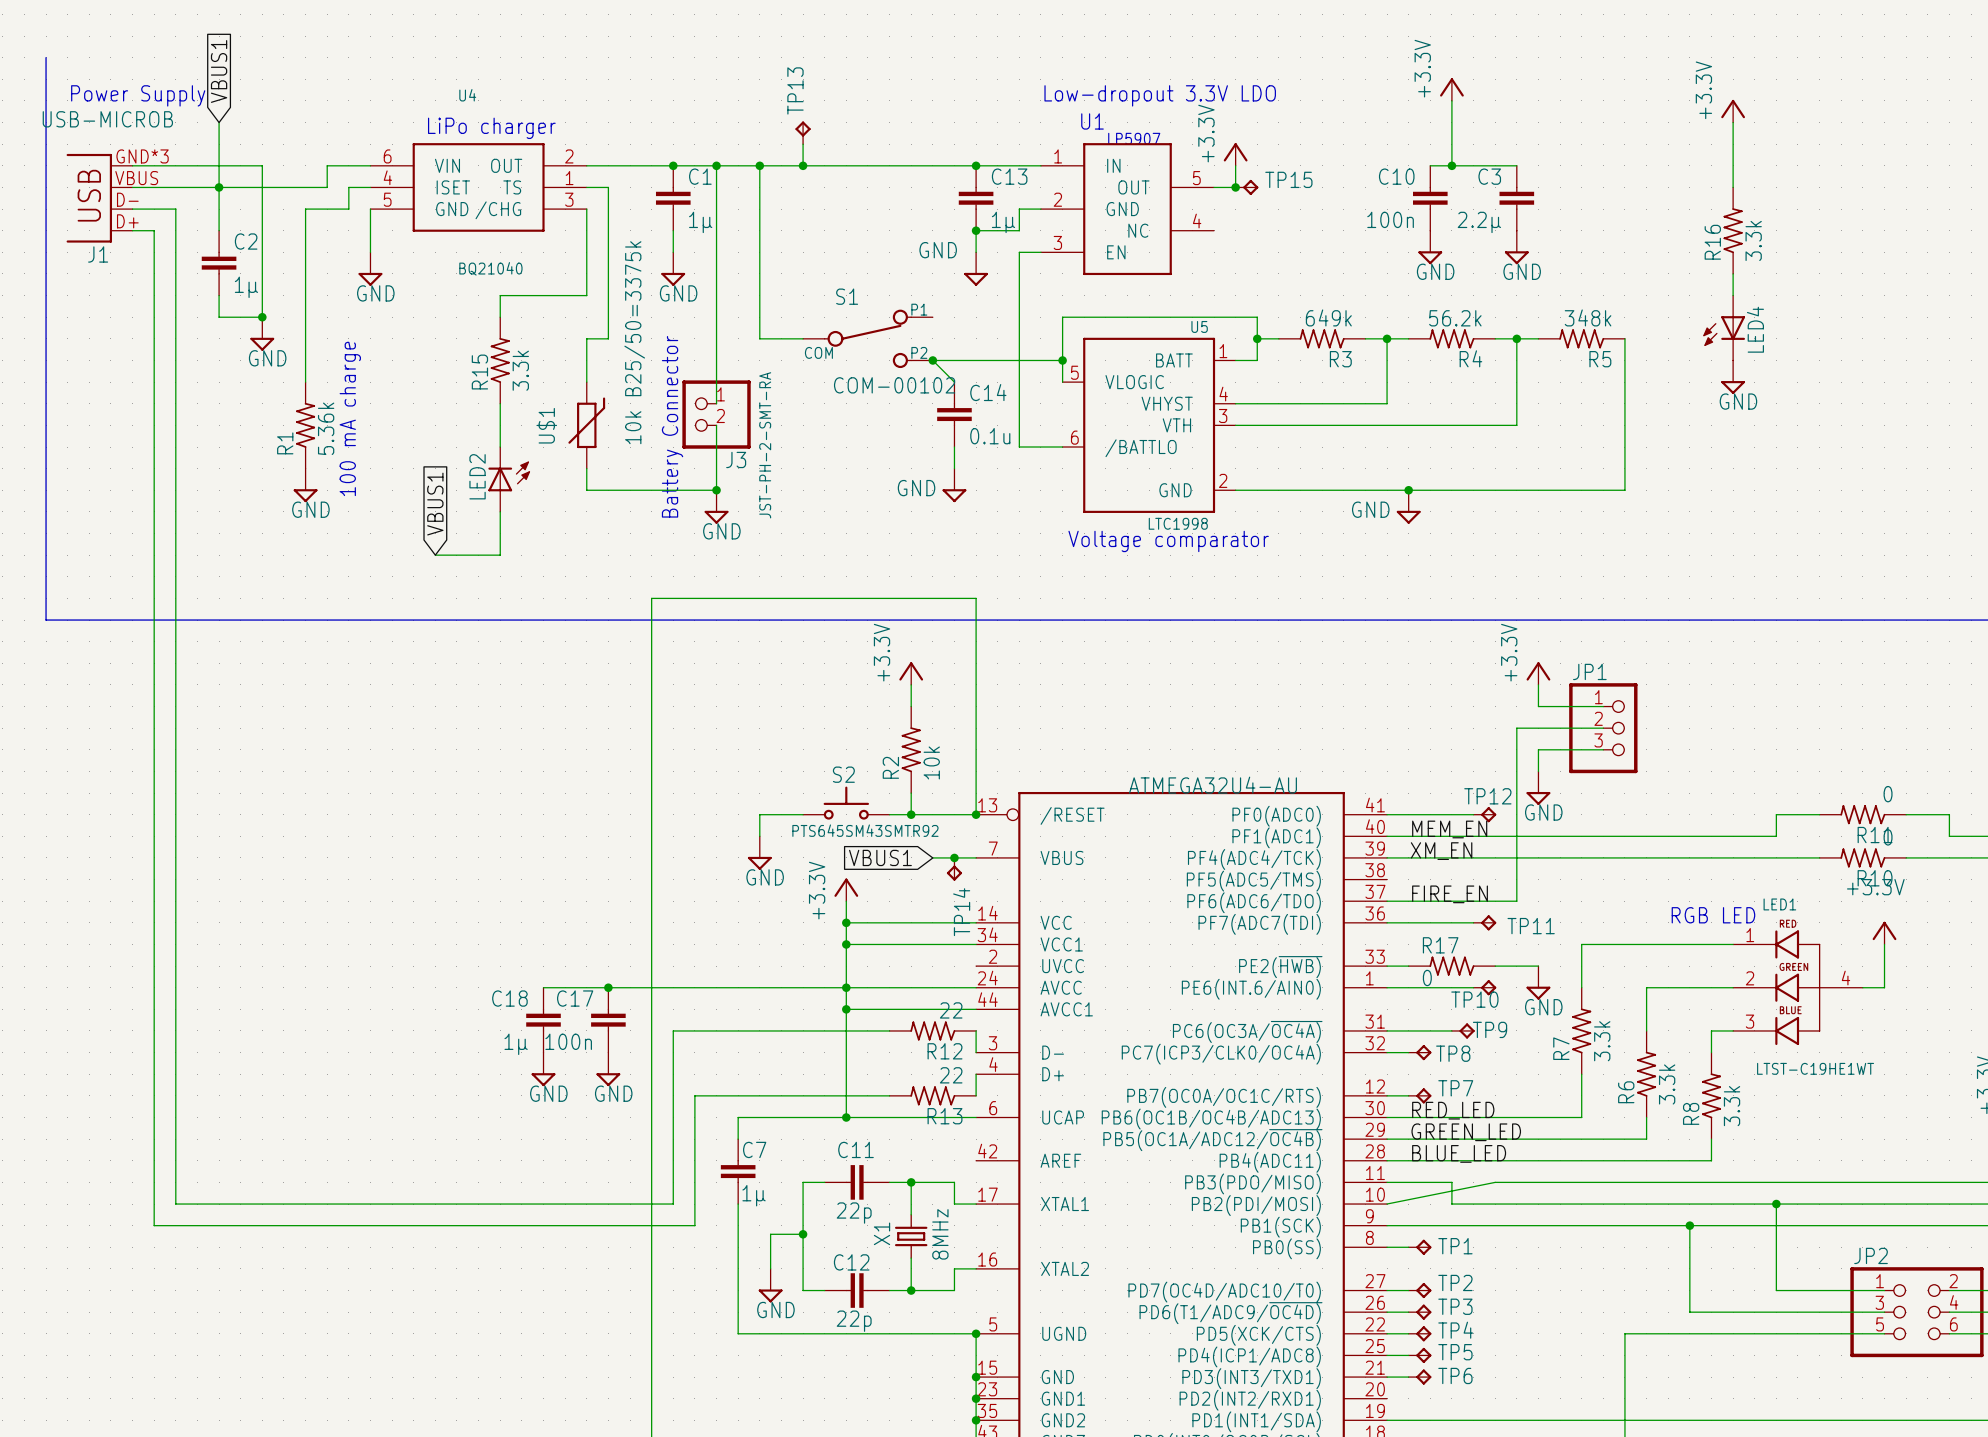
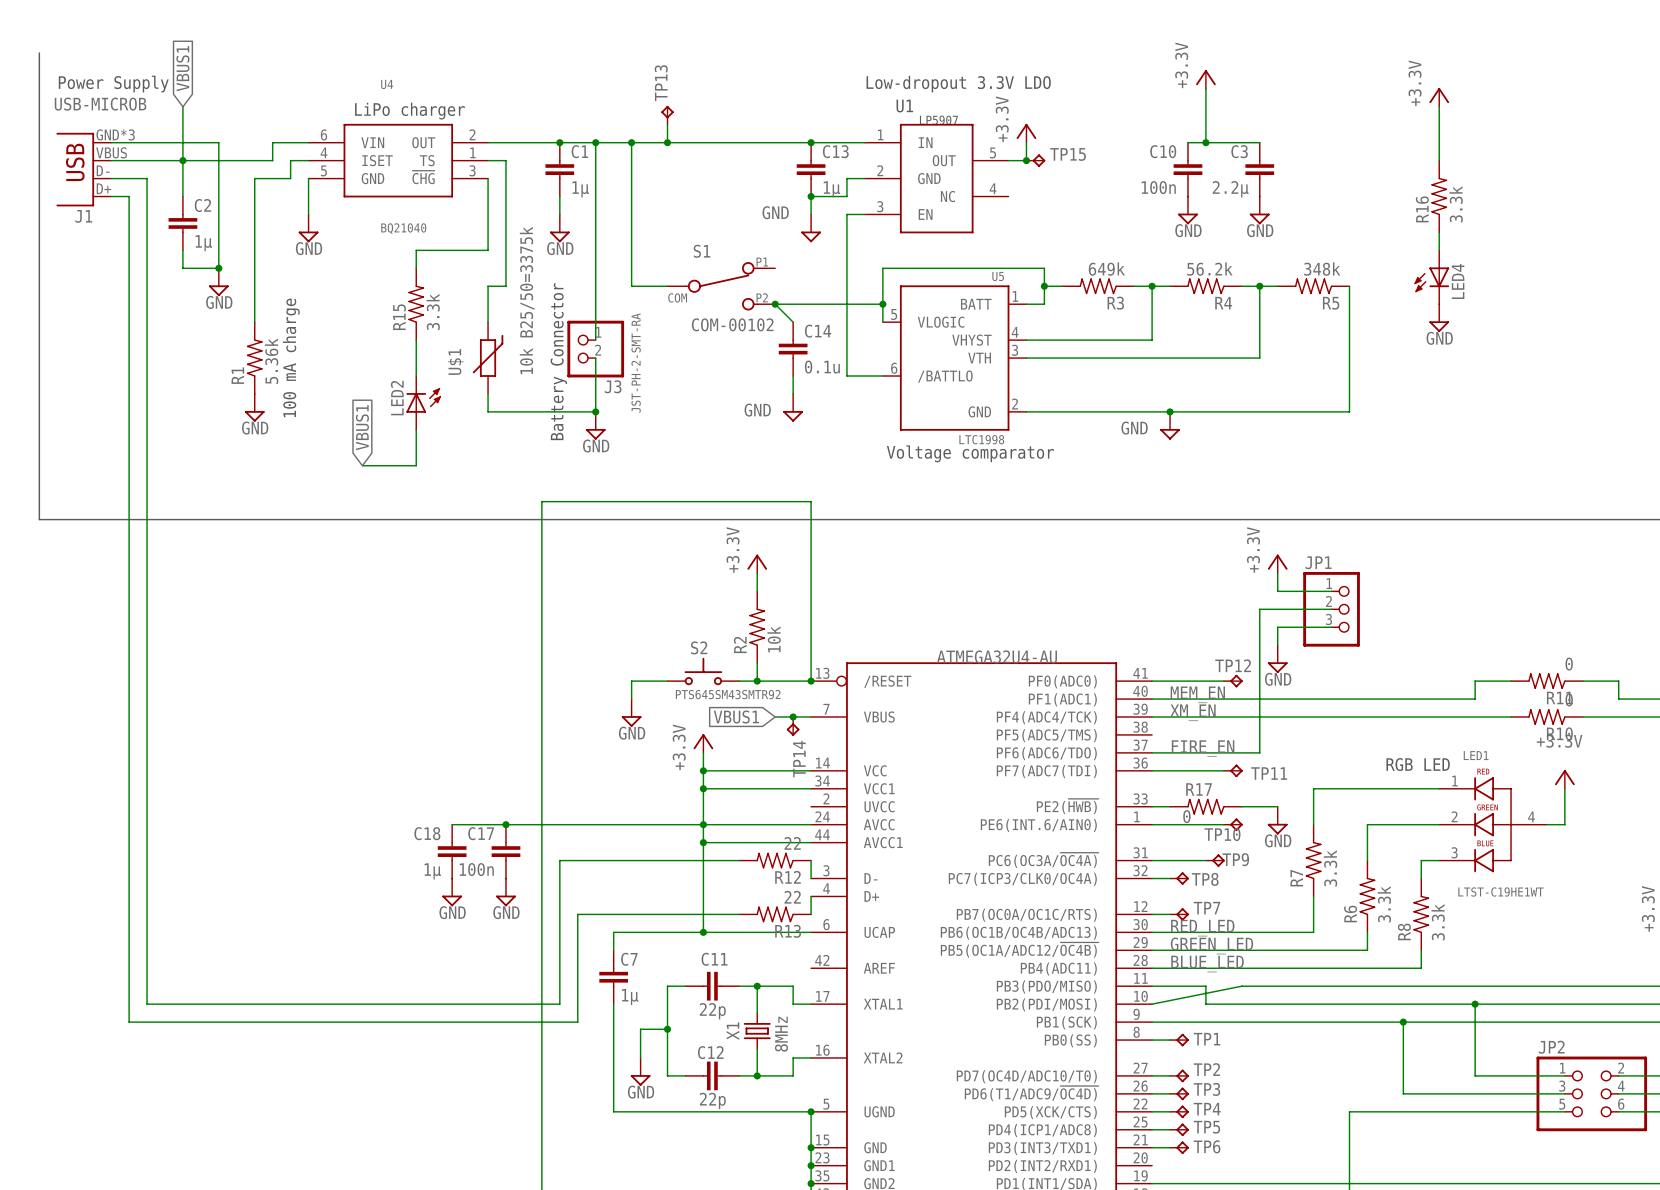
U4 pin name: /CHG (498, 210) -> ~{CHG} (423, 177)

